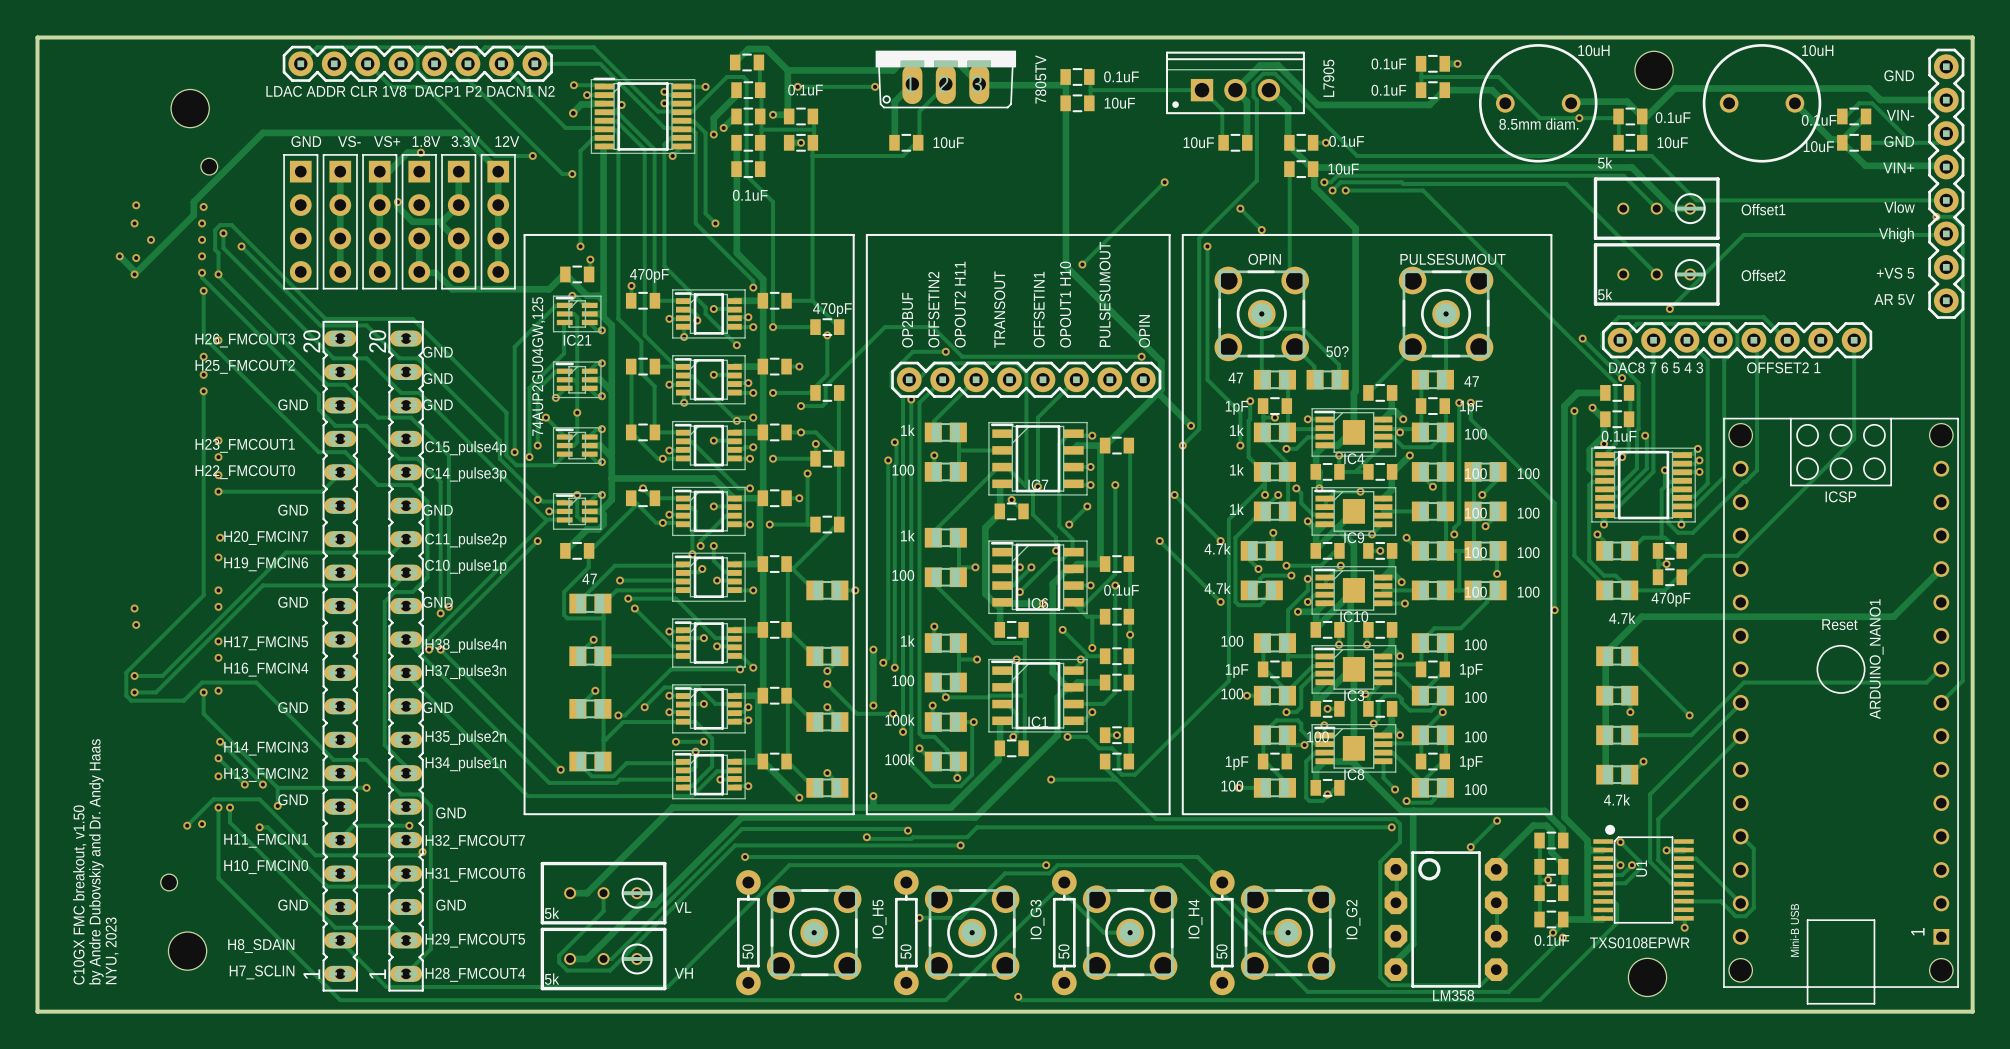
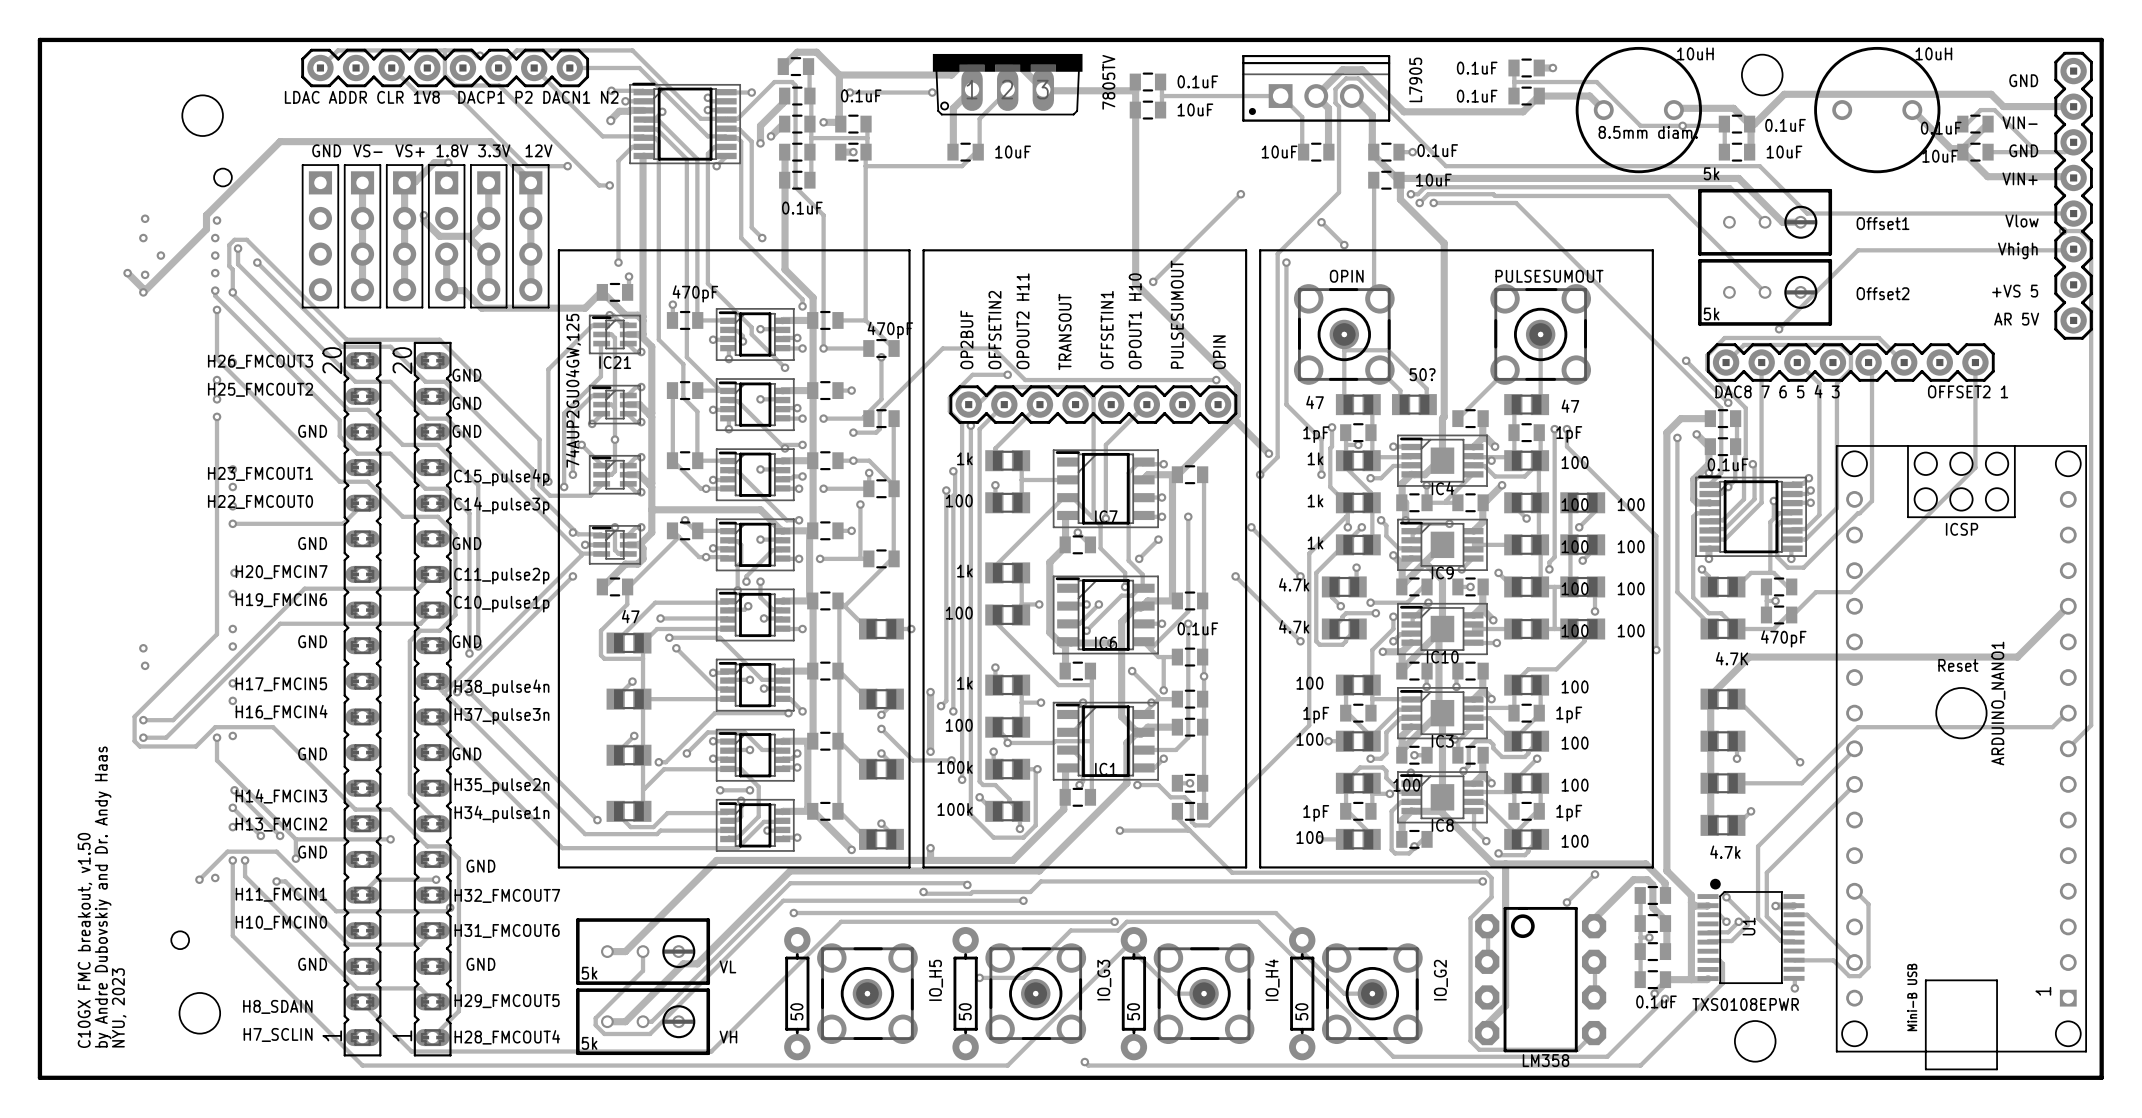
part value: 4.7k (1622, 618) -> 4.7K (1732, 658)

